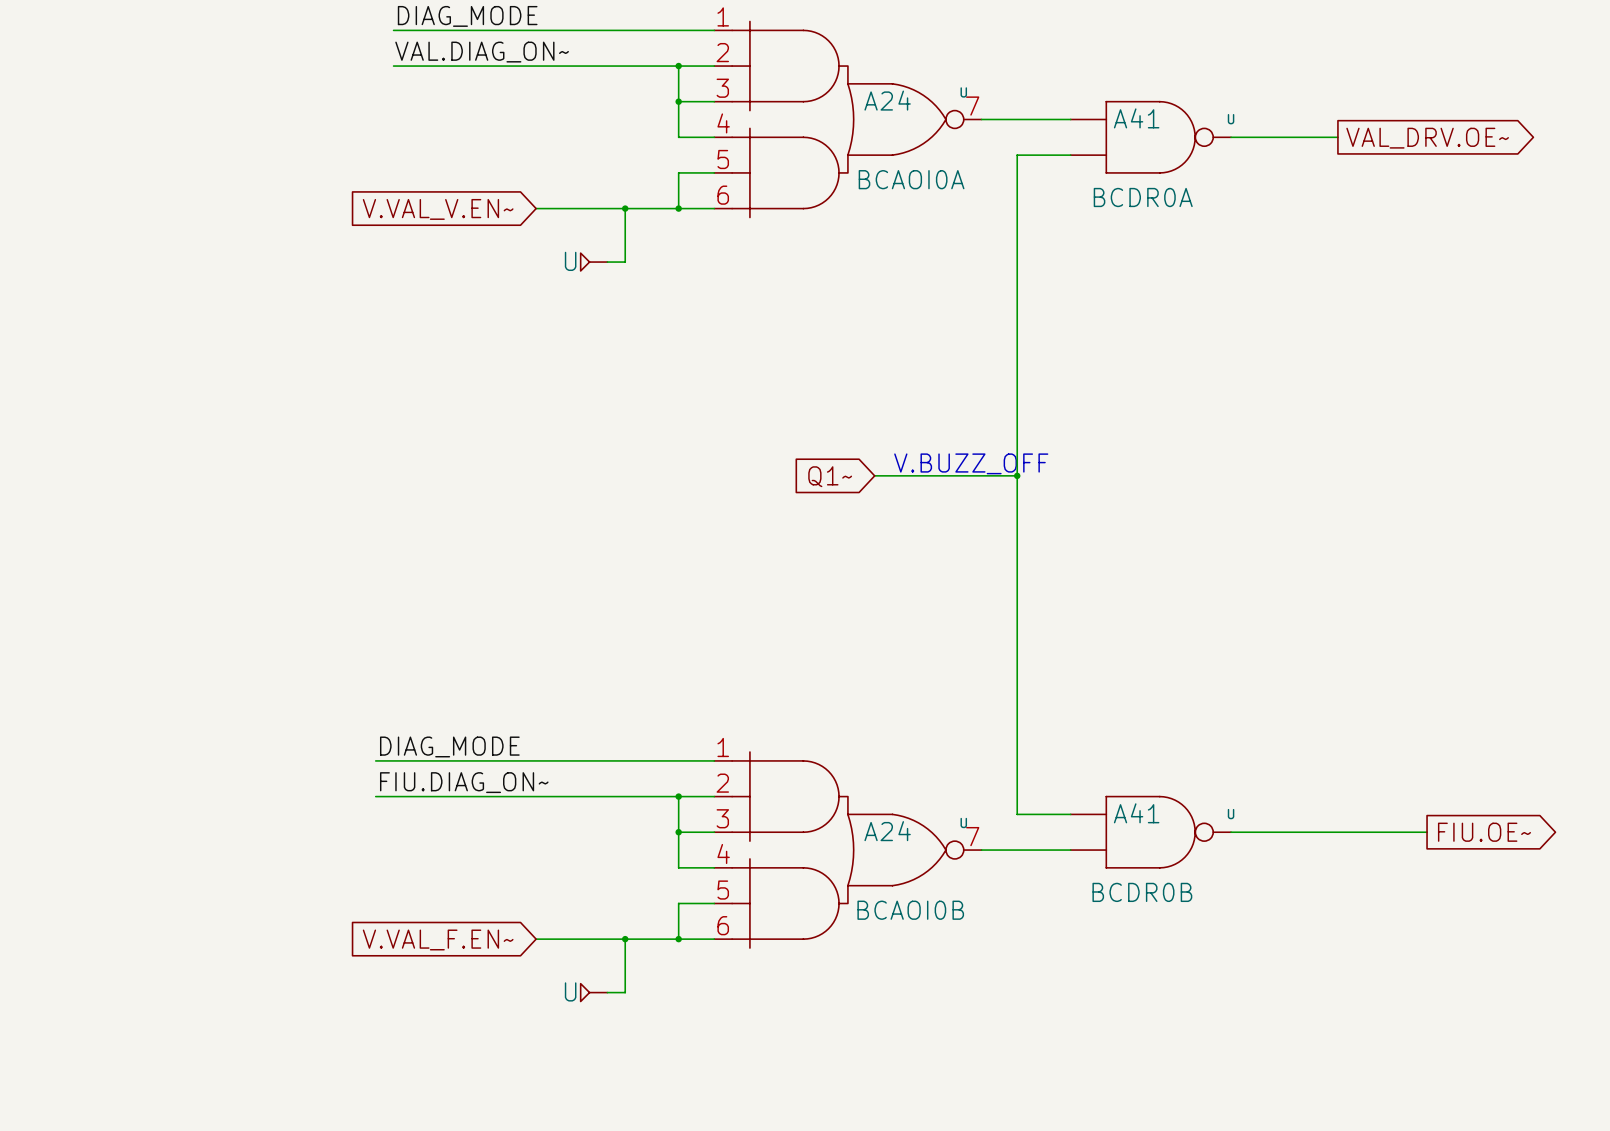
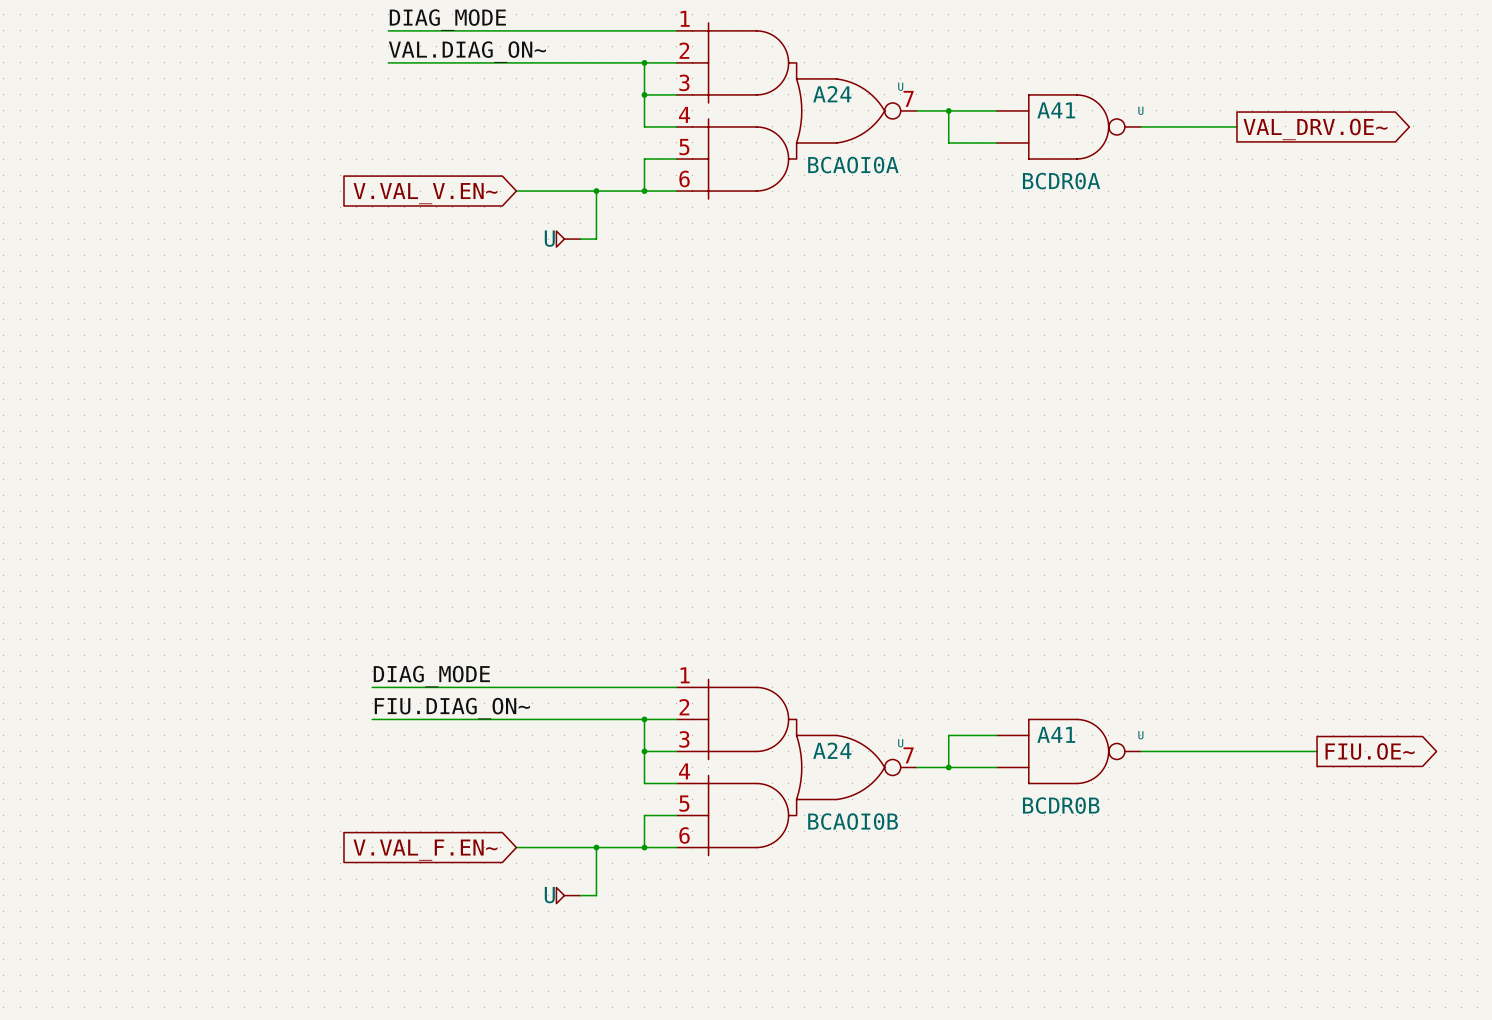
junction: none -> (948, 110)
wire: (1017, 155) (1017, 814) -> (948, 142) (948, 110)
text: V.BUZZ_OFF (971, 463) -> none
wire: (874, 475) (1017, 475) -> none
junction: (1017, 475) -> none
global label: Q1~ (830, 476) -> none
wire: none -> (948, 735) (948, 767)
junction: none -> (948, 767)

